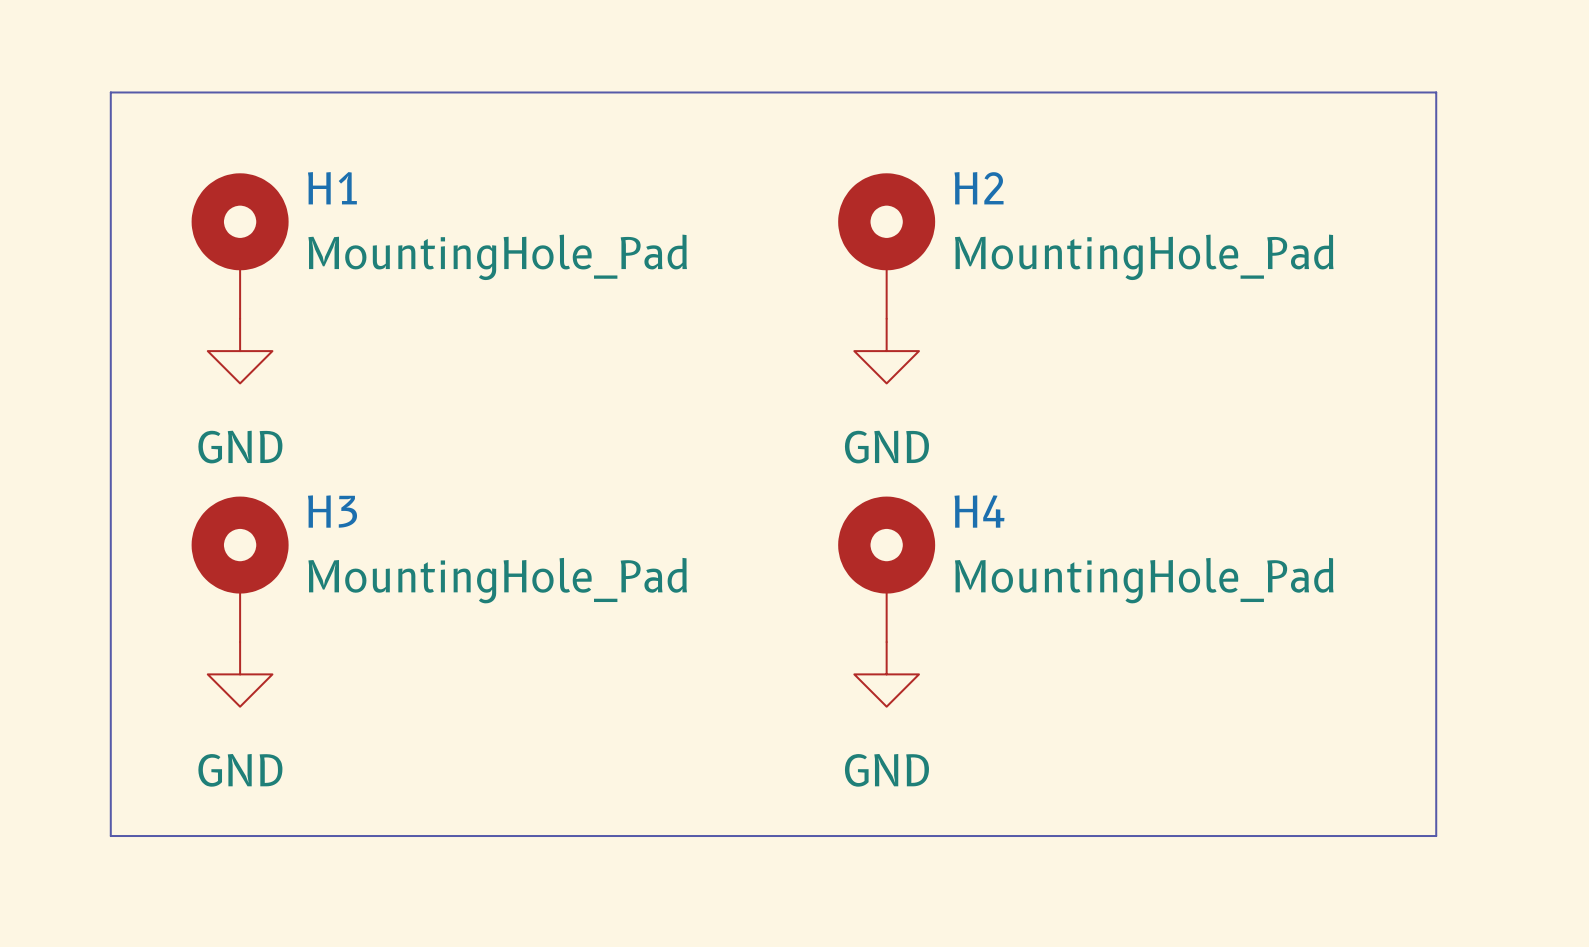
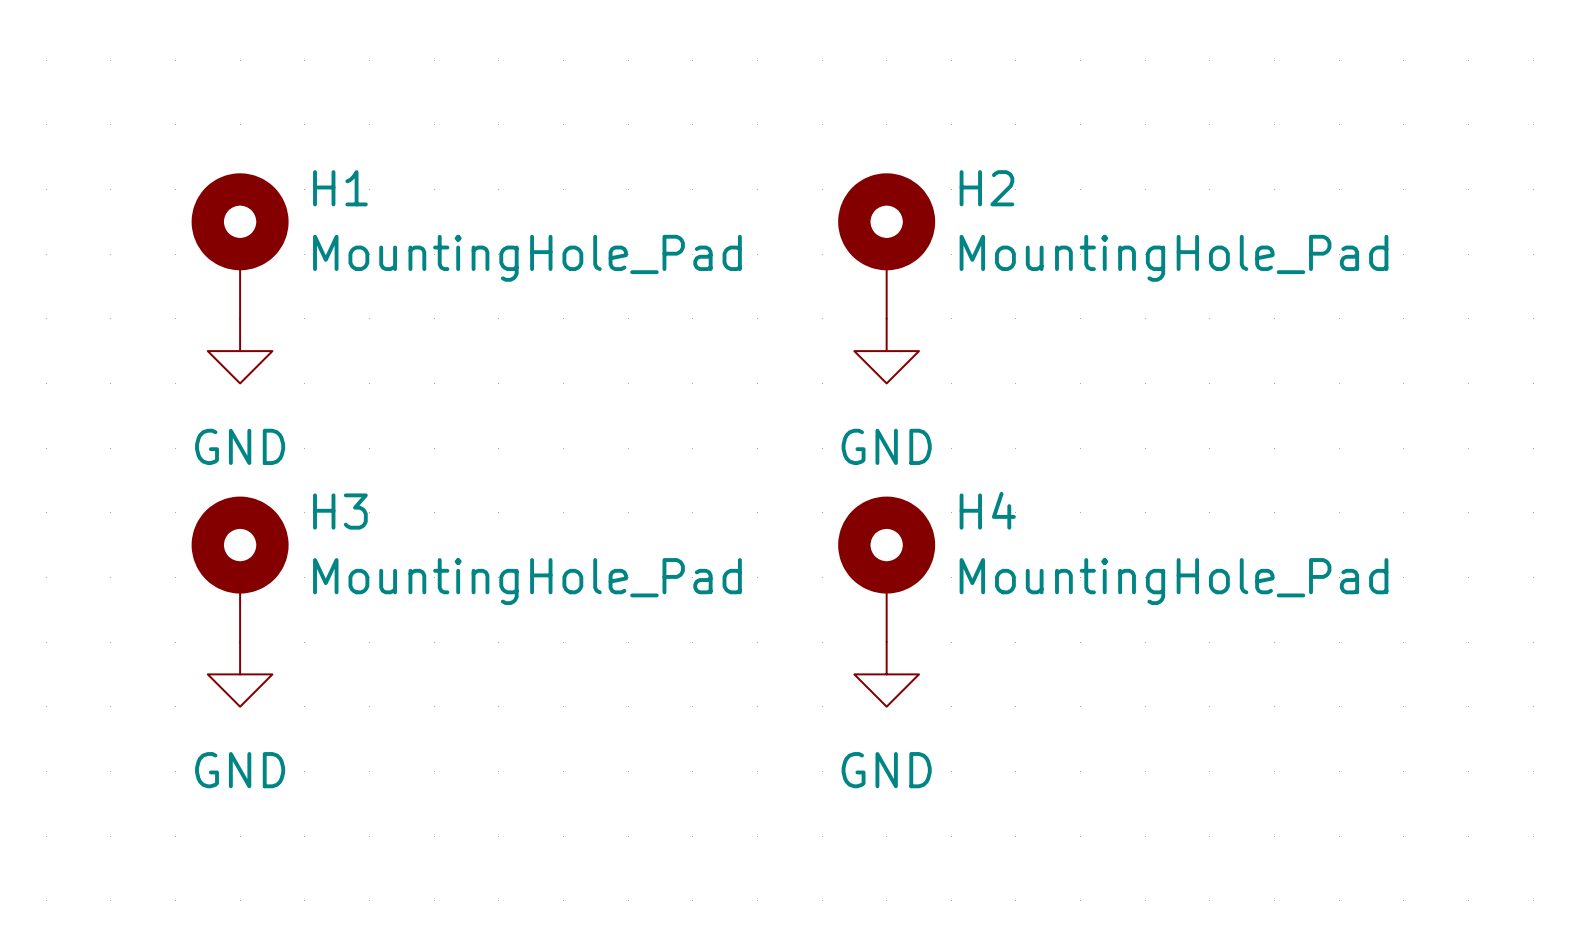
line: (110, 92) (1436, 92) (1436, 836) (110, 836) (110, 92) -> none

